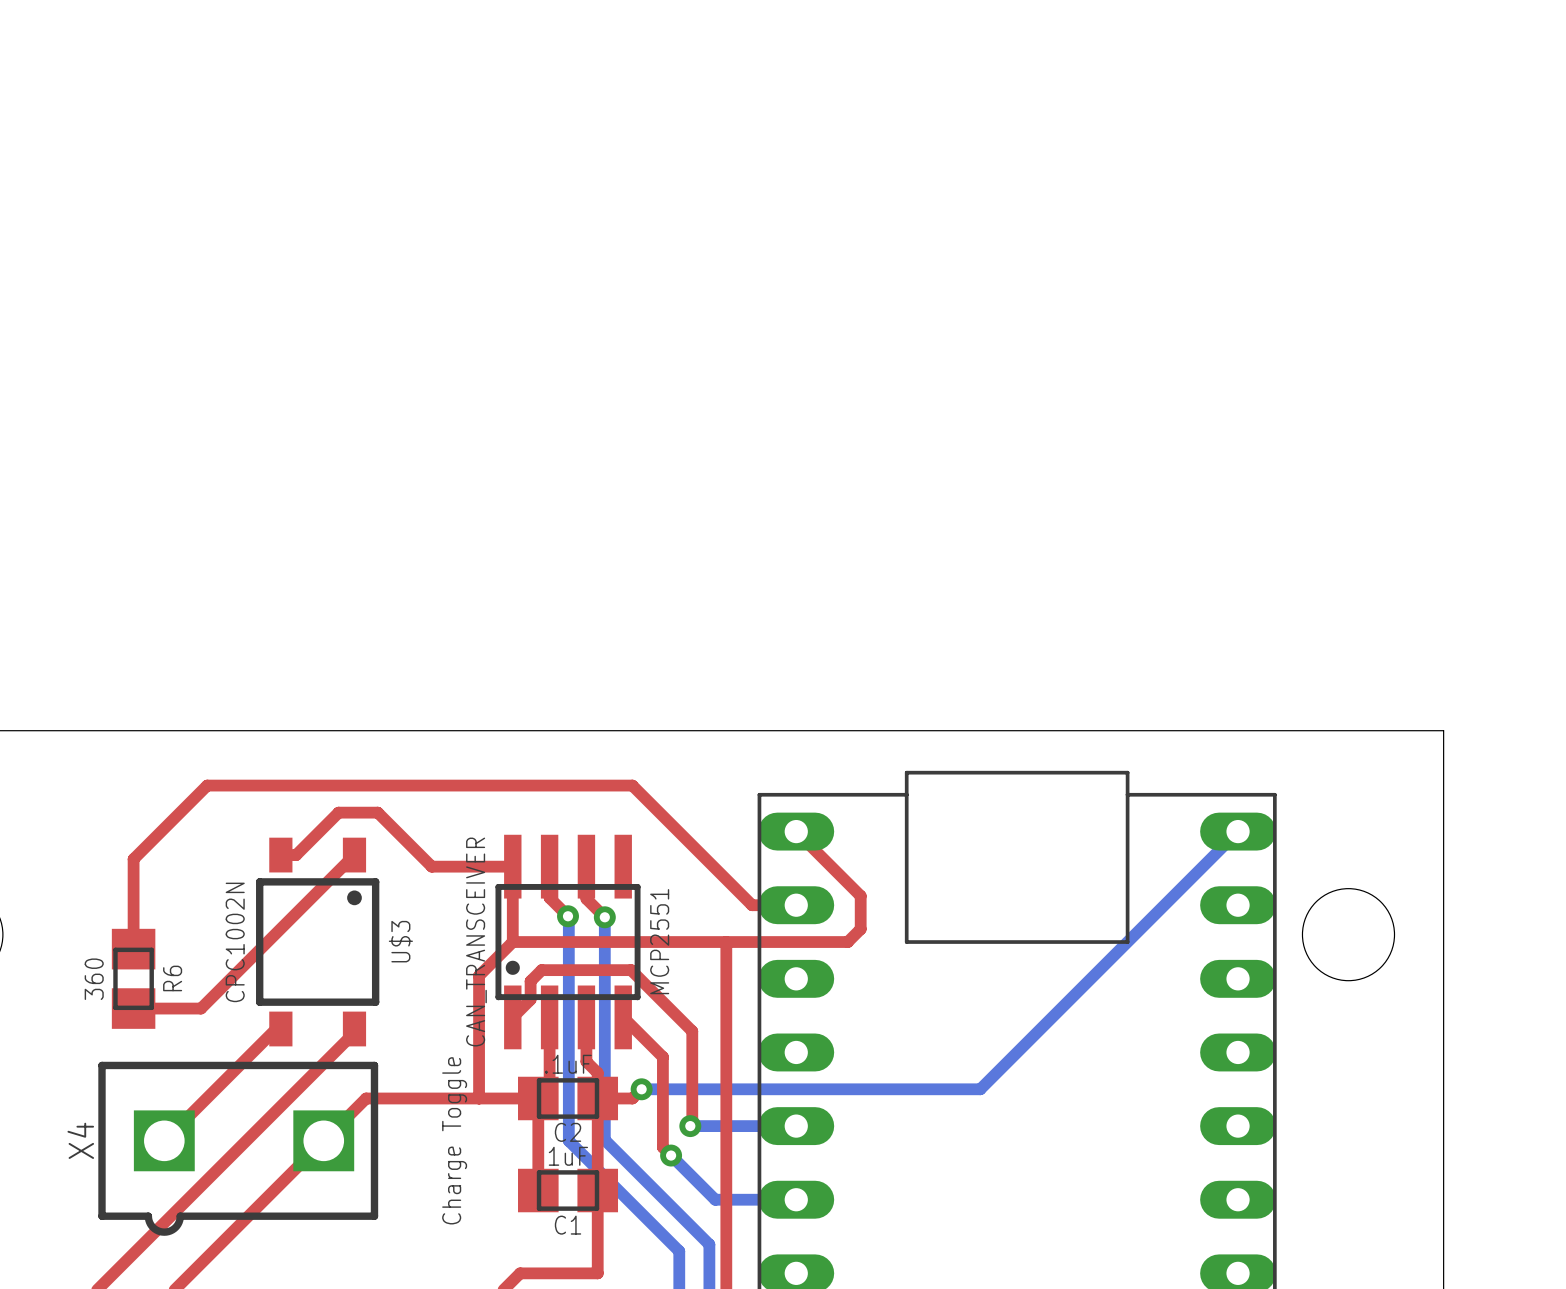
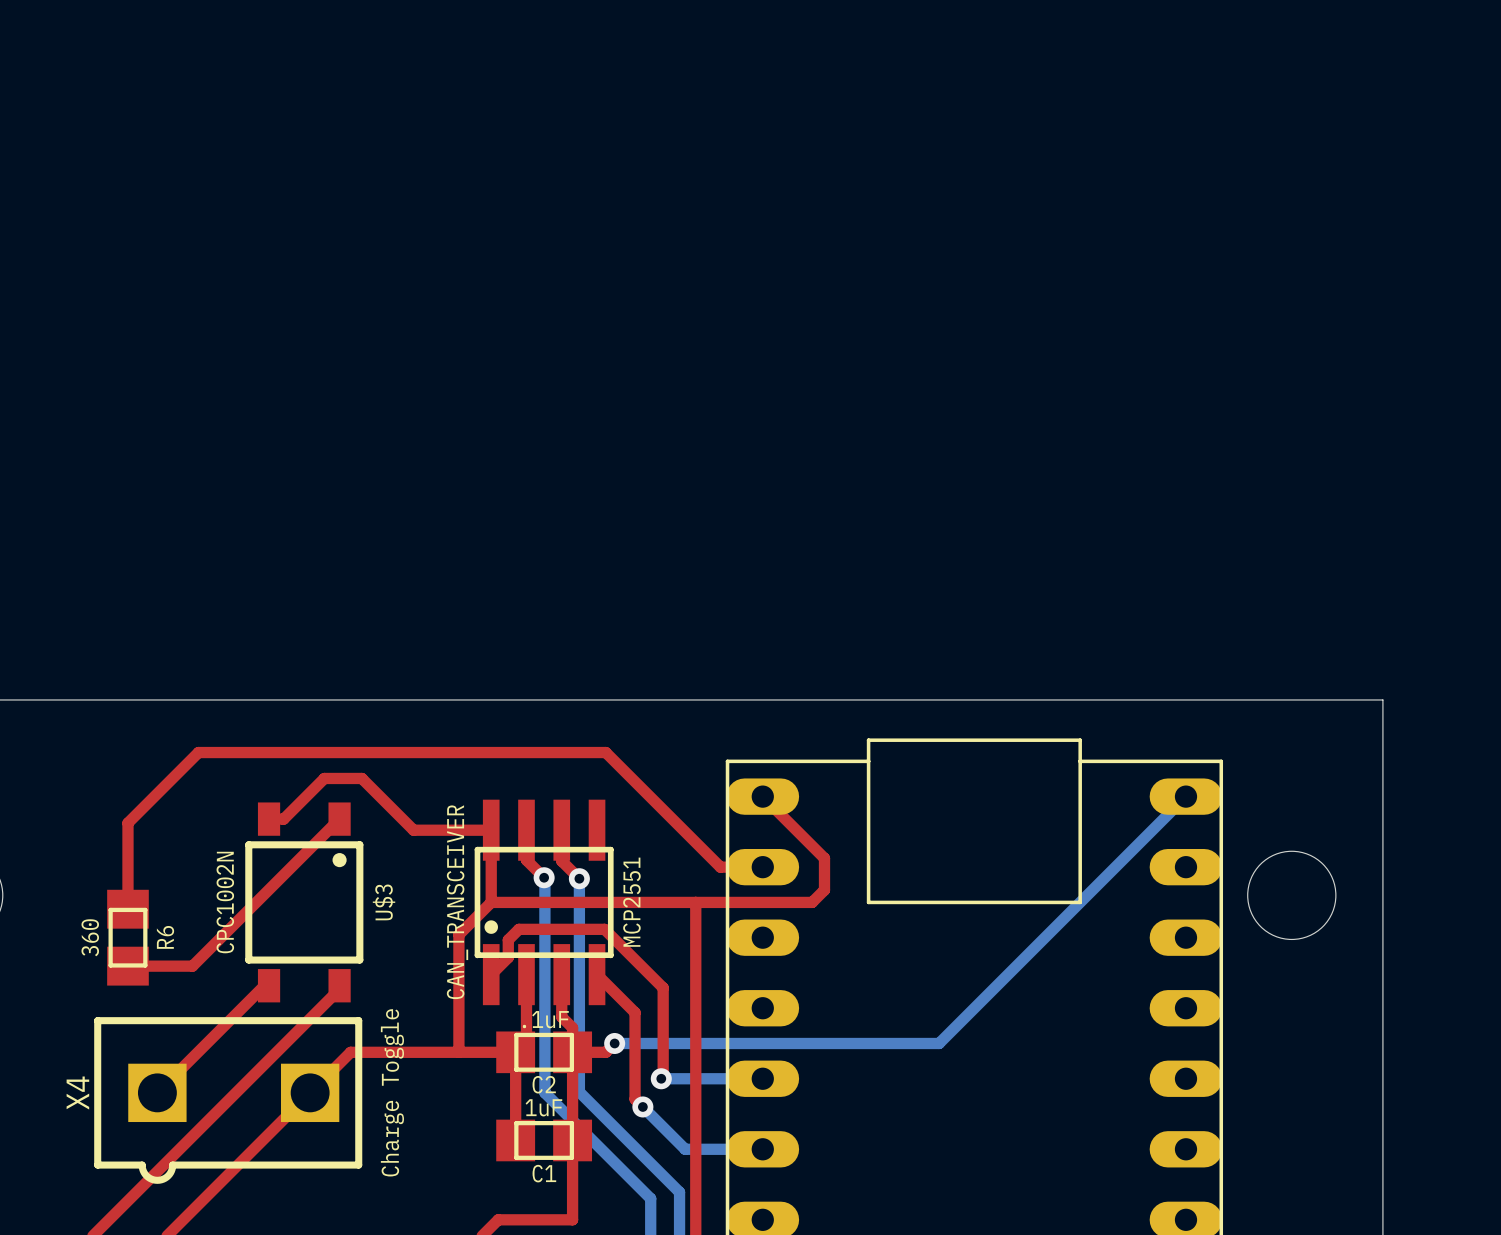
X4 value position: Charge Toggle (454, 1140) -> Charge Toggle (392, 1092)

